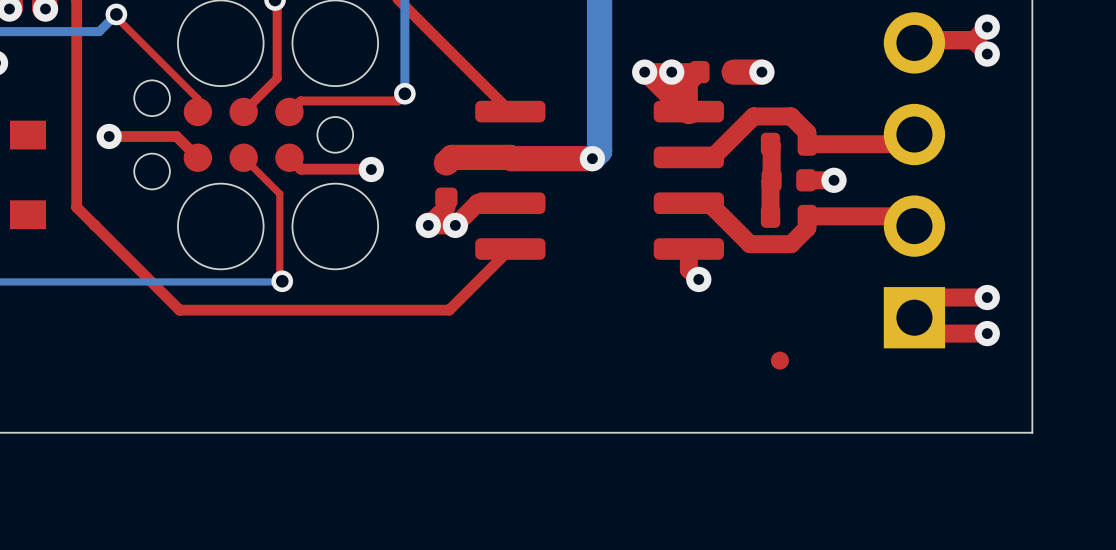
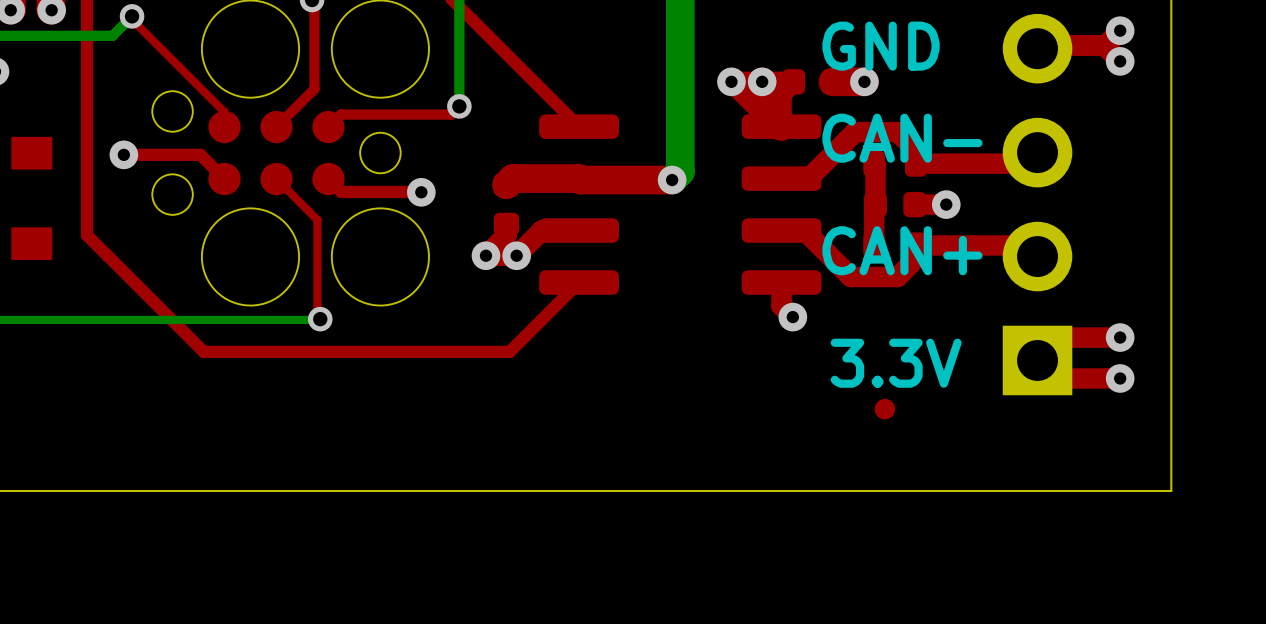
text: none -> GND (881, 46)
text: none -> CAN- (902, 138)
text: none -> CAN+ (902, 250)
text: none -> 3.3V (896, 363)

